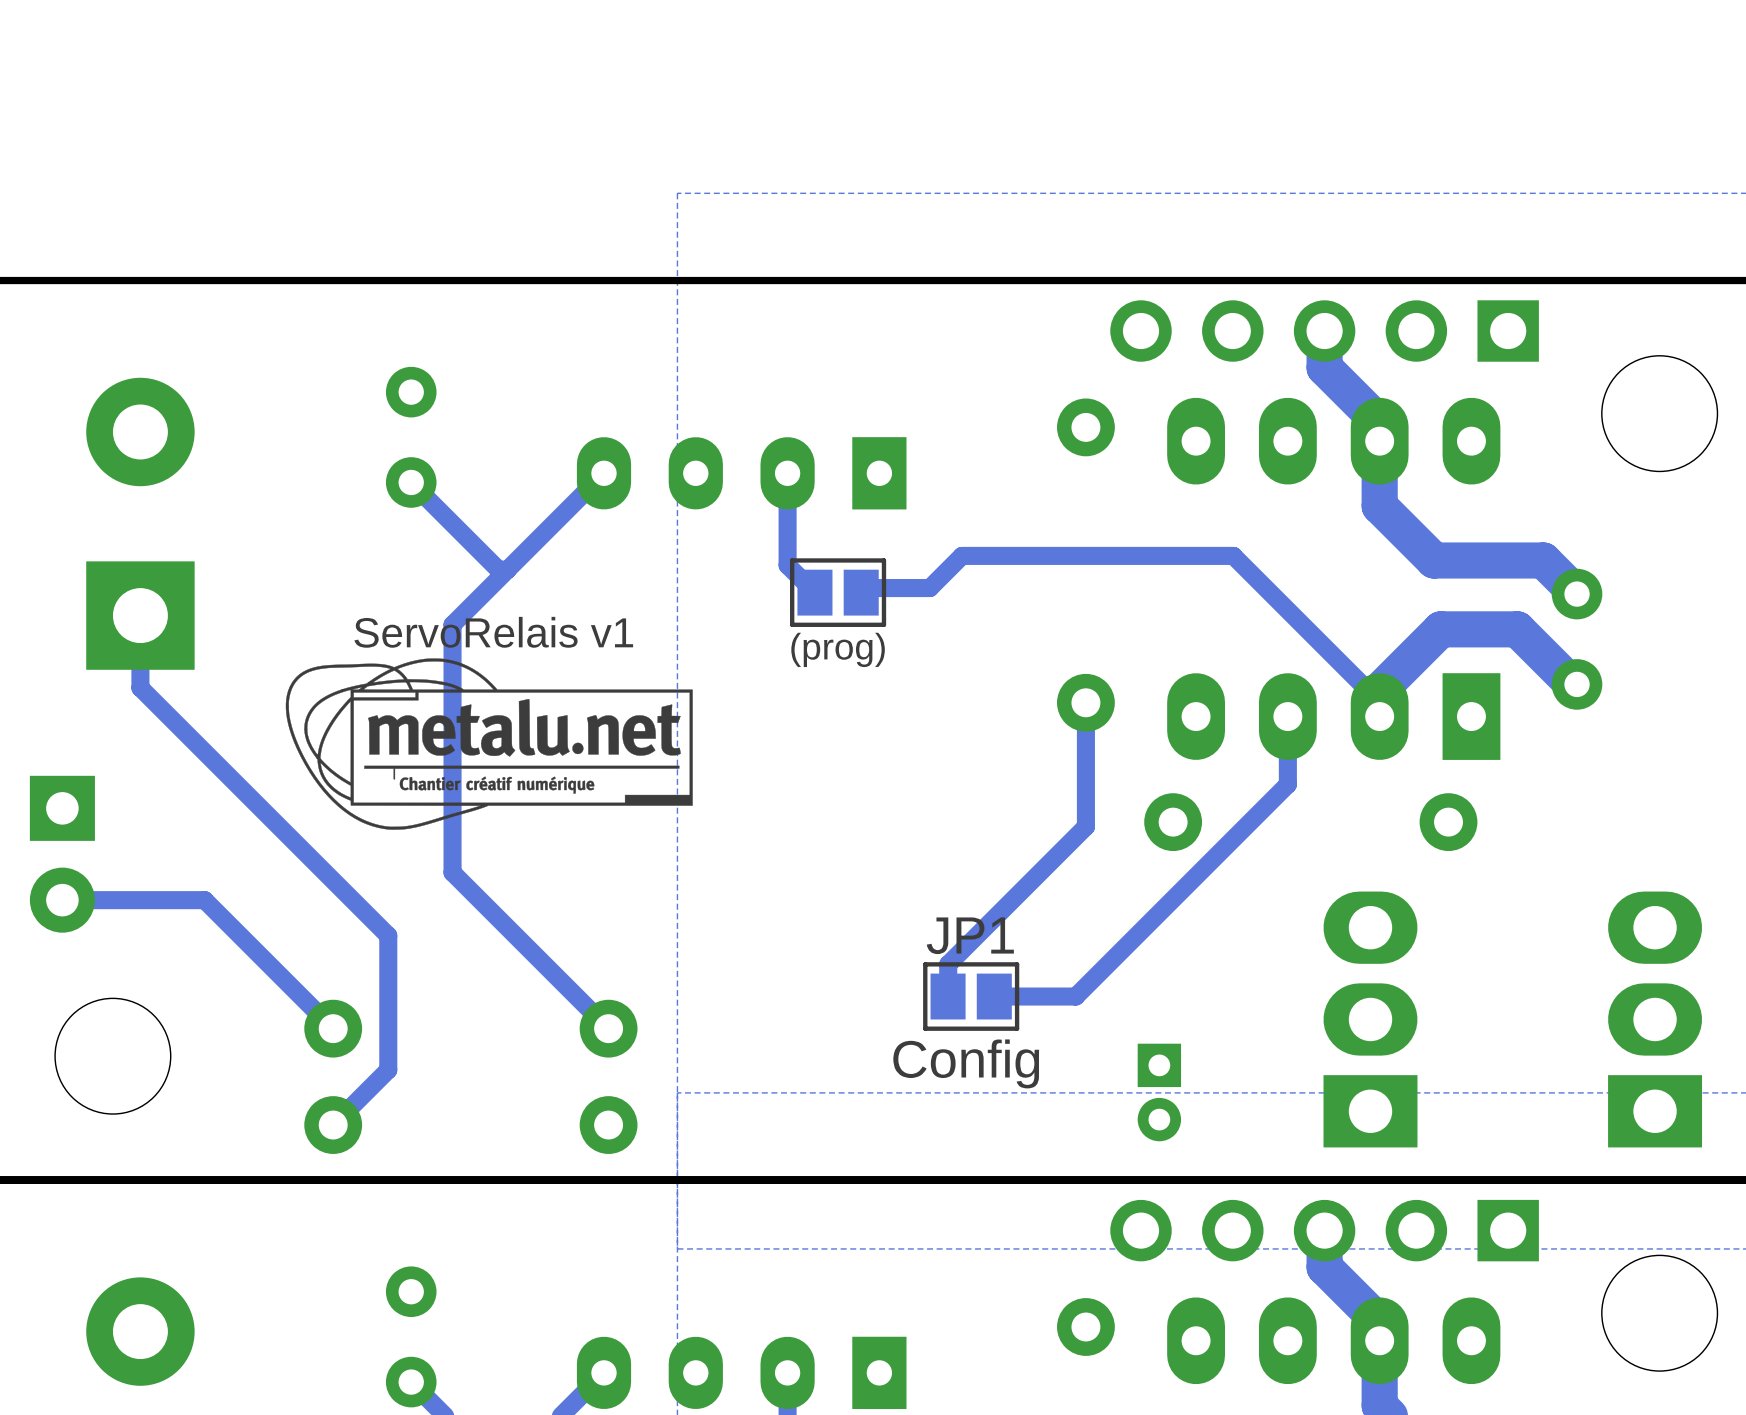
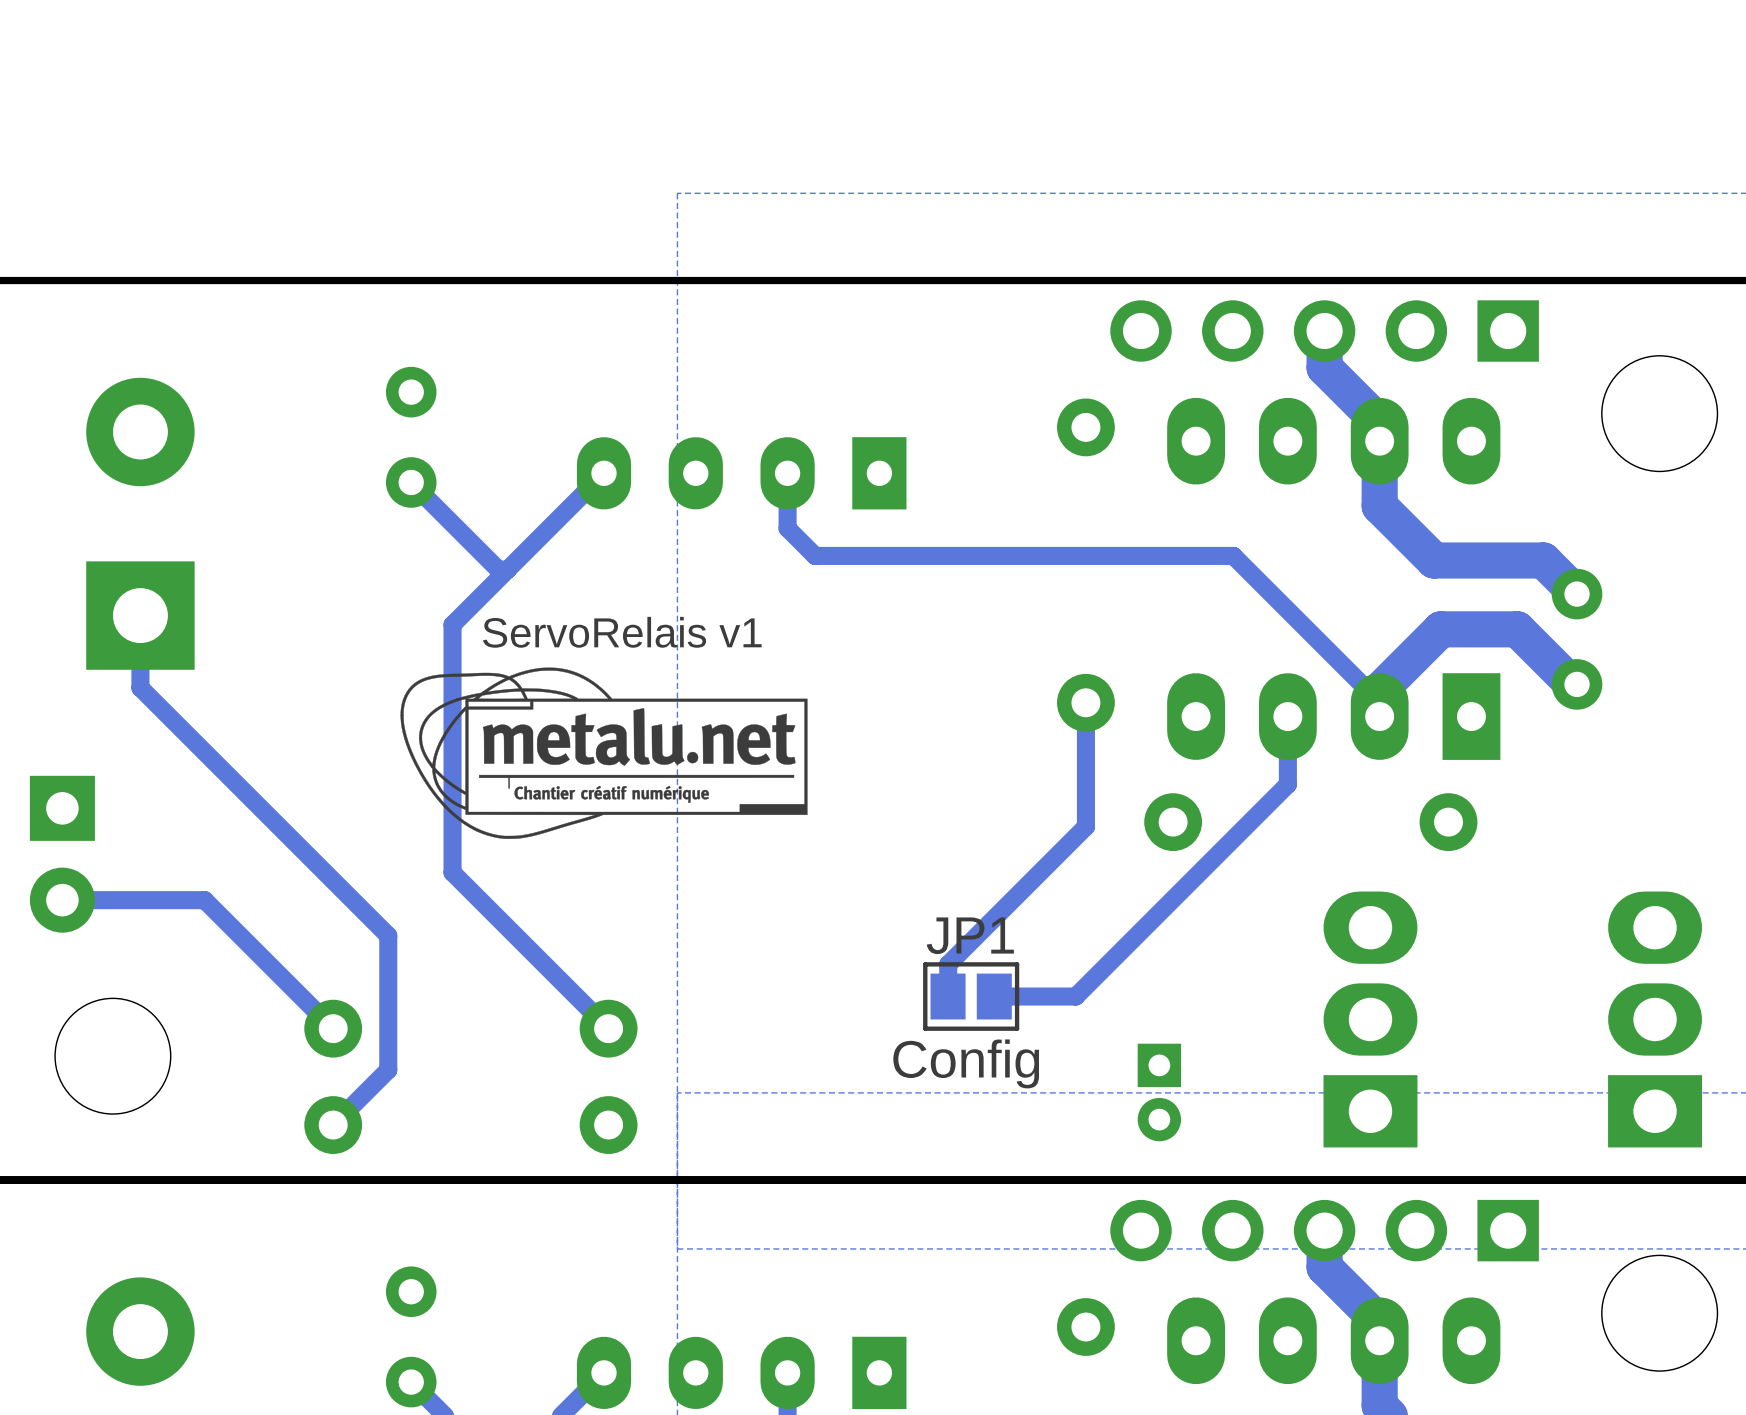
track: (787, 528) (787, 565) (814, 592) -> none
track: (962, 555) (929, 588) (861, 588) -> (962, 555) (815, 555) (787, 528)
part: (prog) (838, 592) -> none
text position: ServoRelais v1 (493, 632) -> ServoRelais v1 (622, 632)
drawing position: (489, 744) -> (604, 753)

